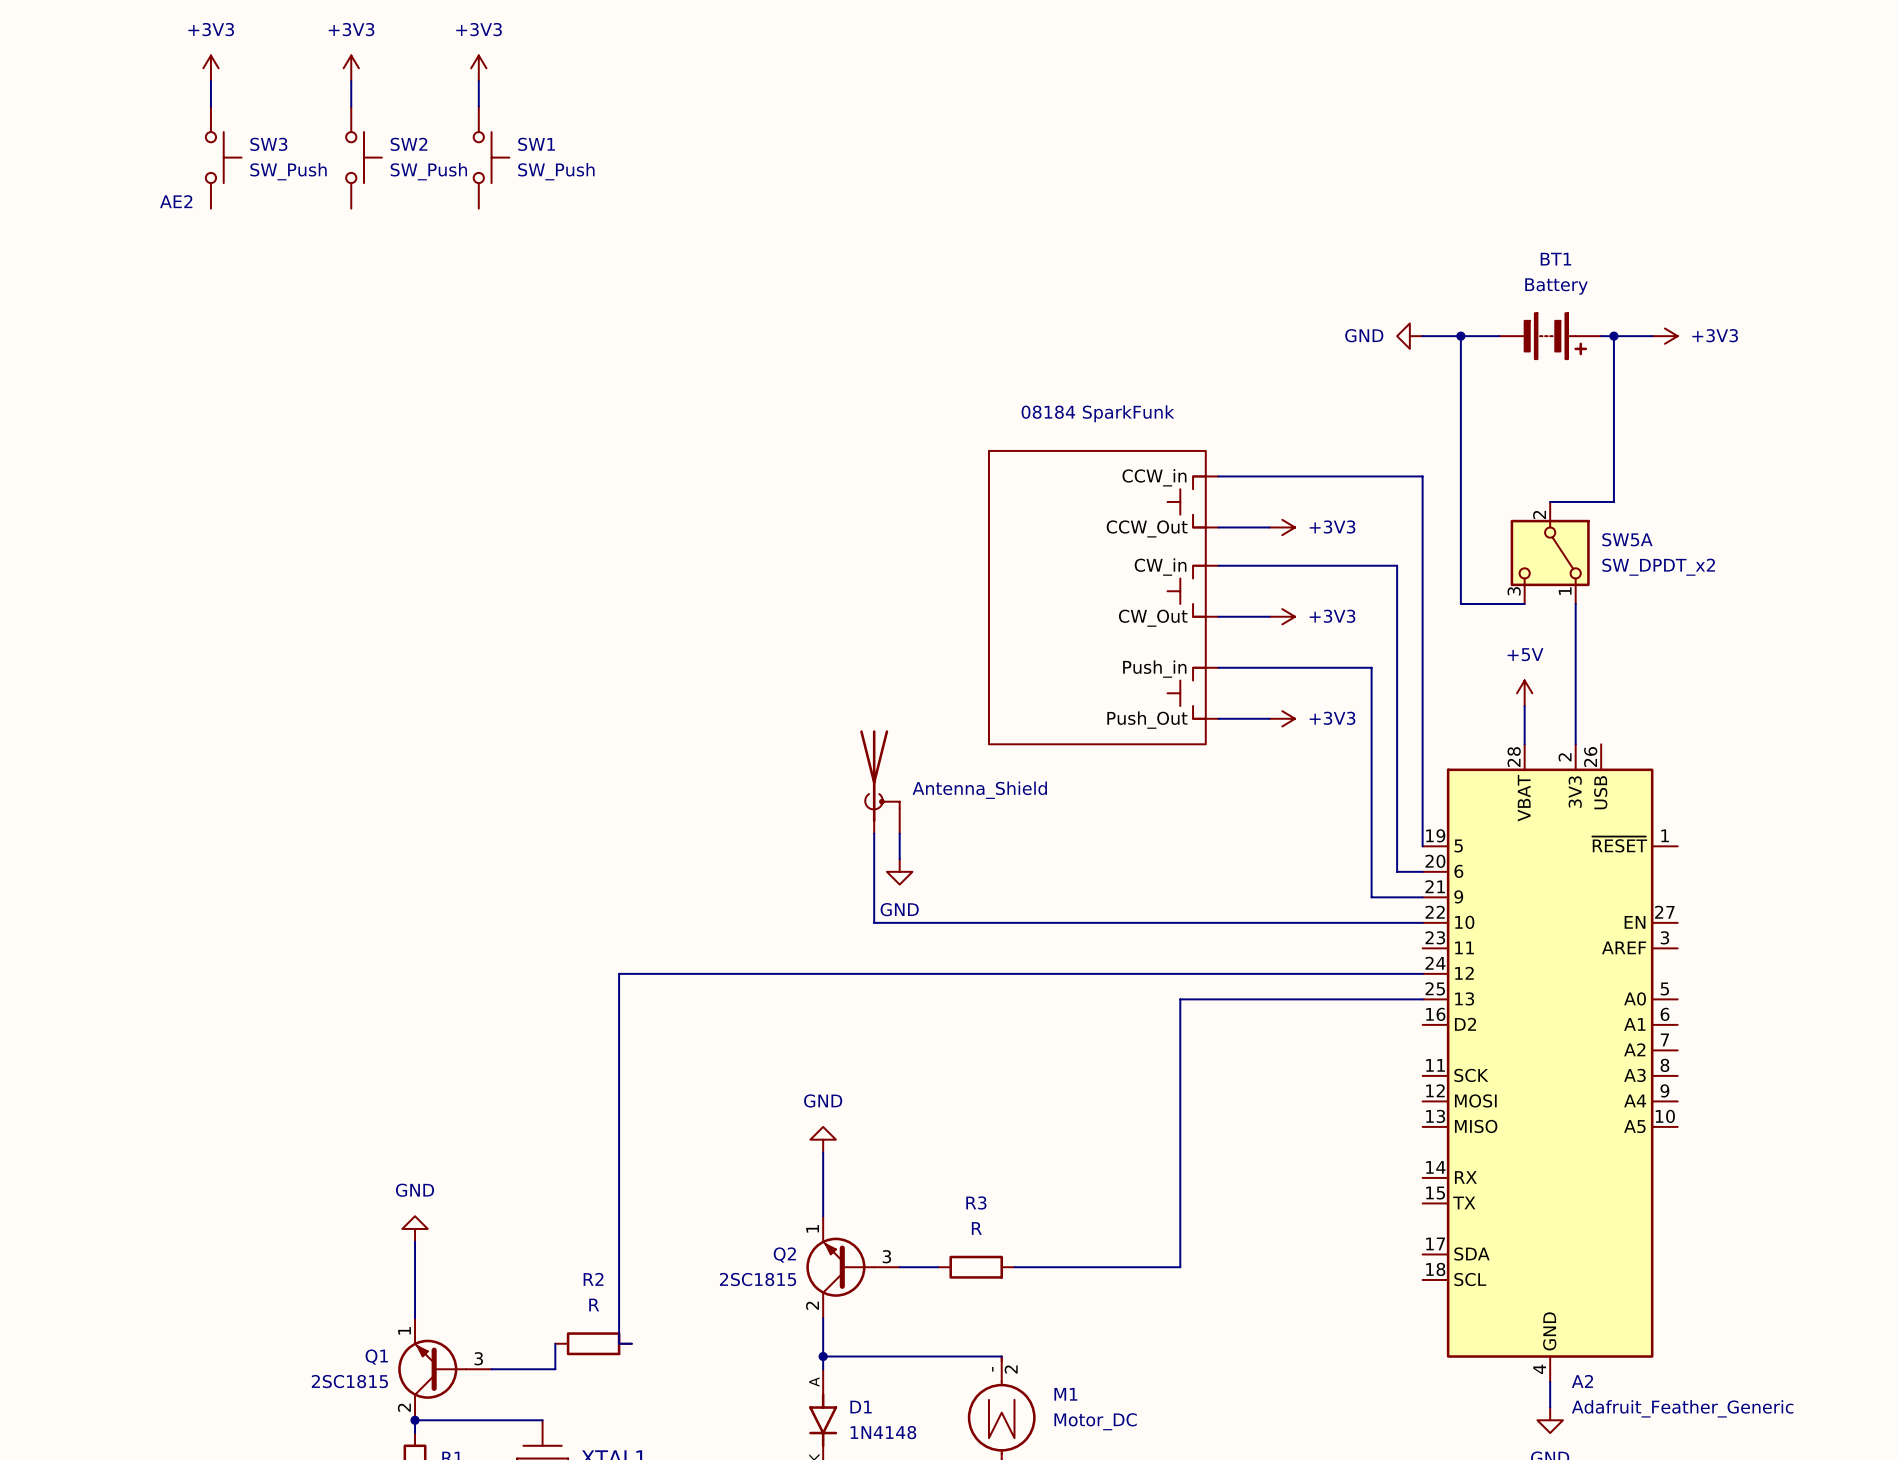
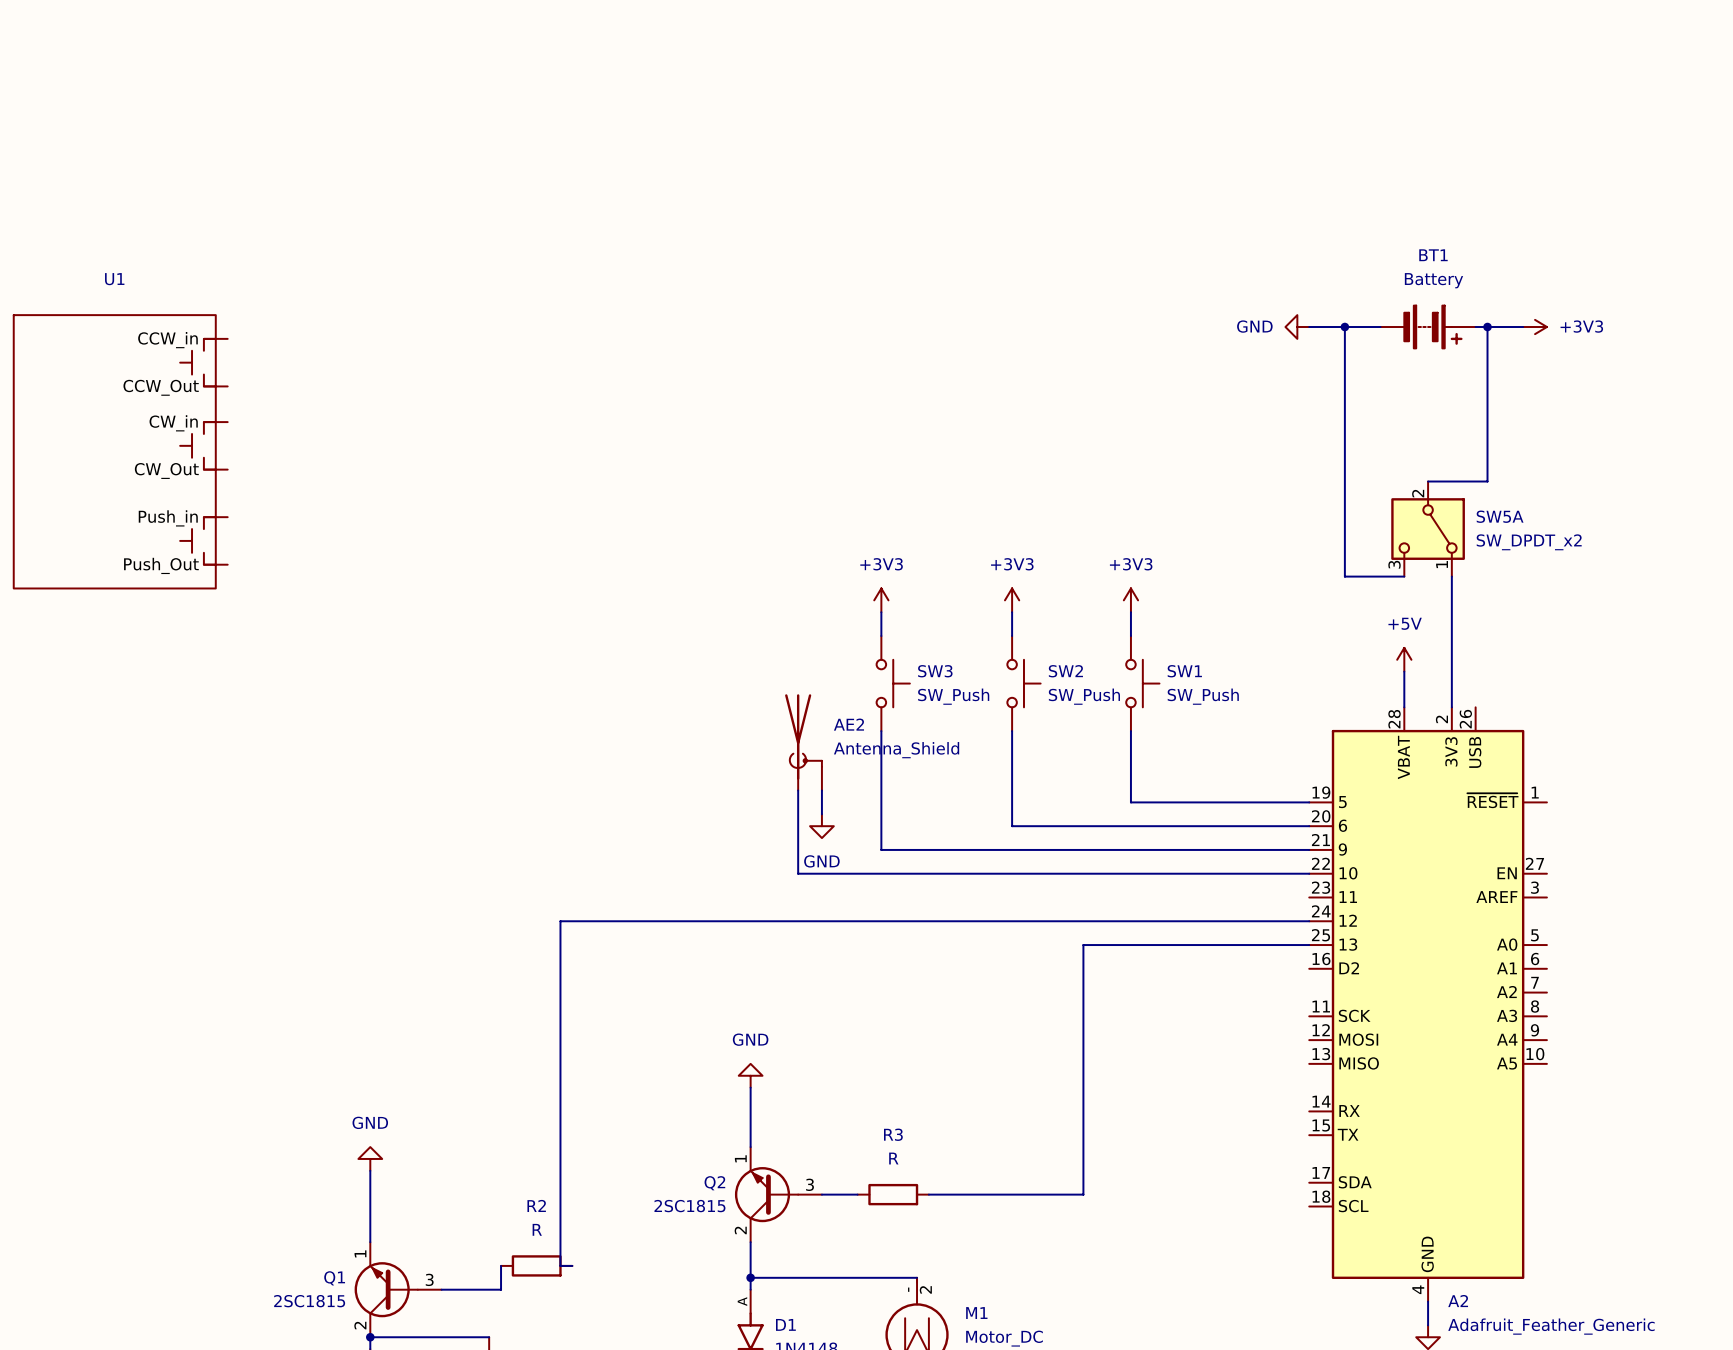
power symbol: +3V3 (210, 68) -> none
power symbol: +3V3 (351, 68) -> none
power symbol: +3V3 (478, 68) -> none
wire: (210, 81) (210, 106) -> none
wire: (351, 81) (351, 106) -> none
wire: (478, 81) (478, 106) -> none
SW3 position: (223, 157) -> (893, 683)
SW2 position: (364, 157) -> (1023, 683)
SW1 position: (491, 157) -> (1142, 683)
AE2 name position: AE2 (176, 201) -> AE2 (848, 724)
U1: none -> (120, 451)
wire: (1218, 476) (1422, 476) (1422, 846) -> (1130, 731) (1130, 802) (1309, 802)
wire: (1218, 527) (1269, 527) -> none
power symbol: +3V3 (1282, 527) -> none
wire: (1218, 565) (1397, 565) (1397, 871) -> (1012, 731) (1012, 826) (1285, 826)
08184 SparkFunk: (1103, 597) -> none
wire: (1218, 616) (1269, 616) -> none
power symbol: +3V3 (1282, 616) -> none
power symbol: none -> +3V3 (881, 600)
power symbol: none -> +3V3 (1012, 600)
power symbol: none -> +3V3 (1130, 600)
wire: none -> (881, 612) (881, 636)
wire: none -> (1012, 612) (1012, 636)
wire: none -> (1130, 612) (1130, 636)
wire: (1218, 667) (1371, 667) (1371, 897) -> (881, 731) (881, 849) (1261, 849)
wire: (1218, 718) (1269, 718) -> none
power symbol: +3V3 (1282, 718) -> none

